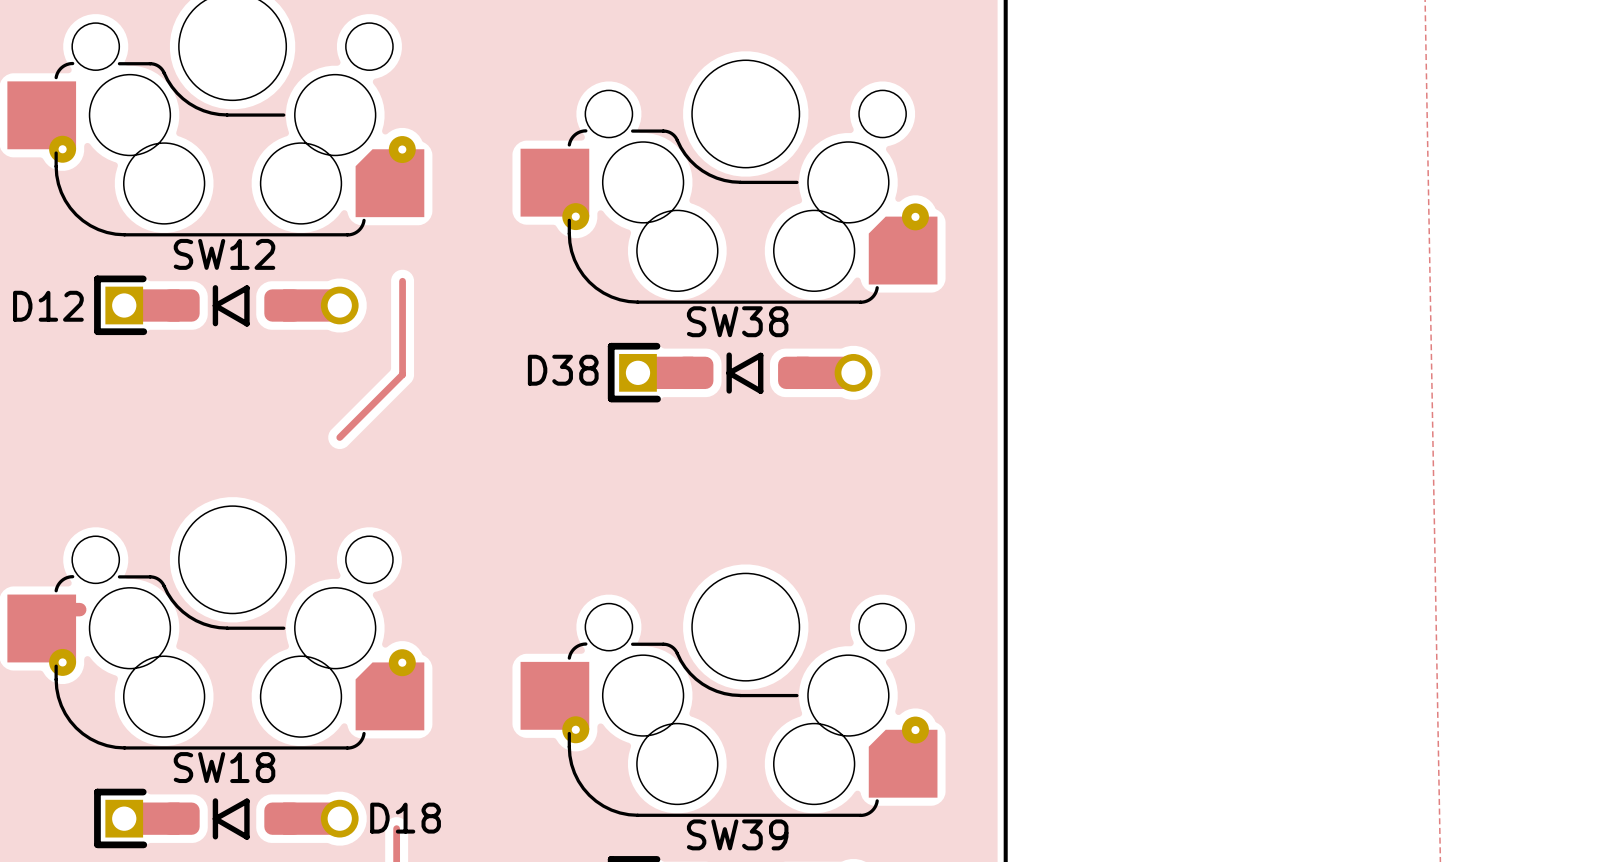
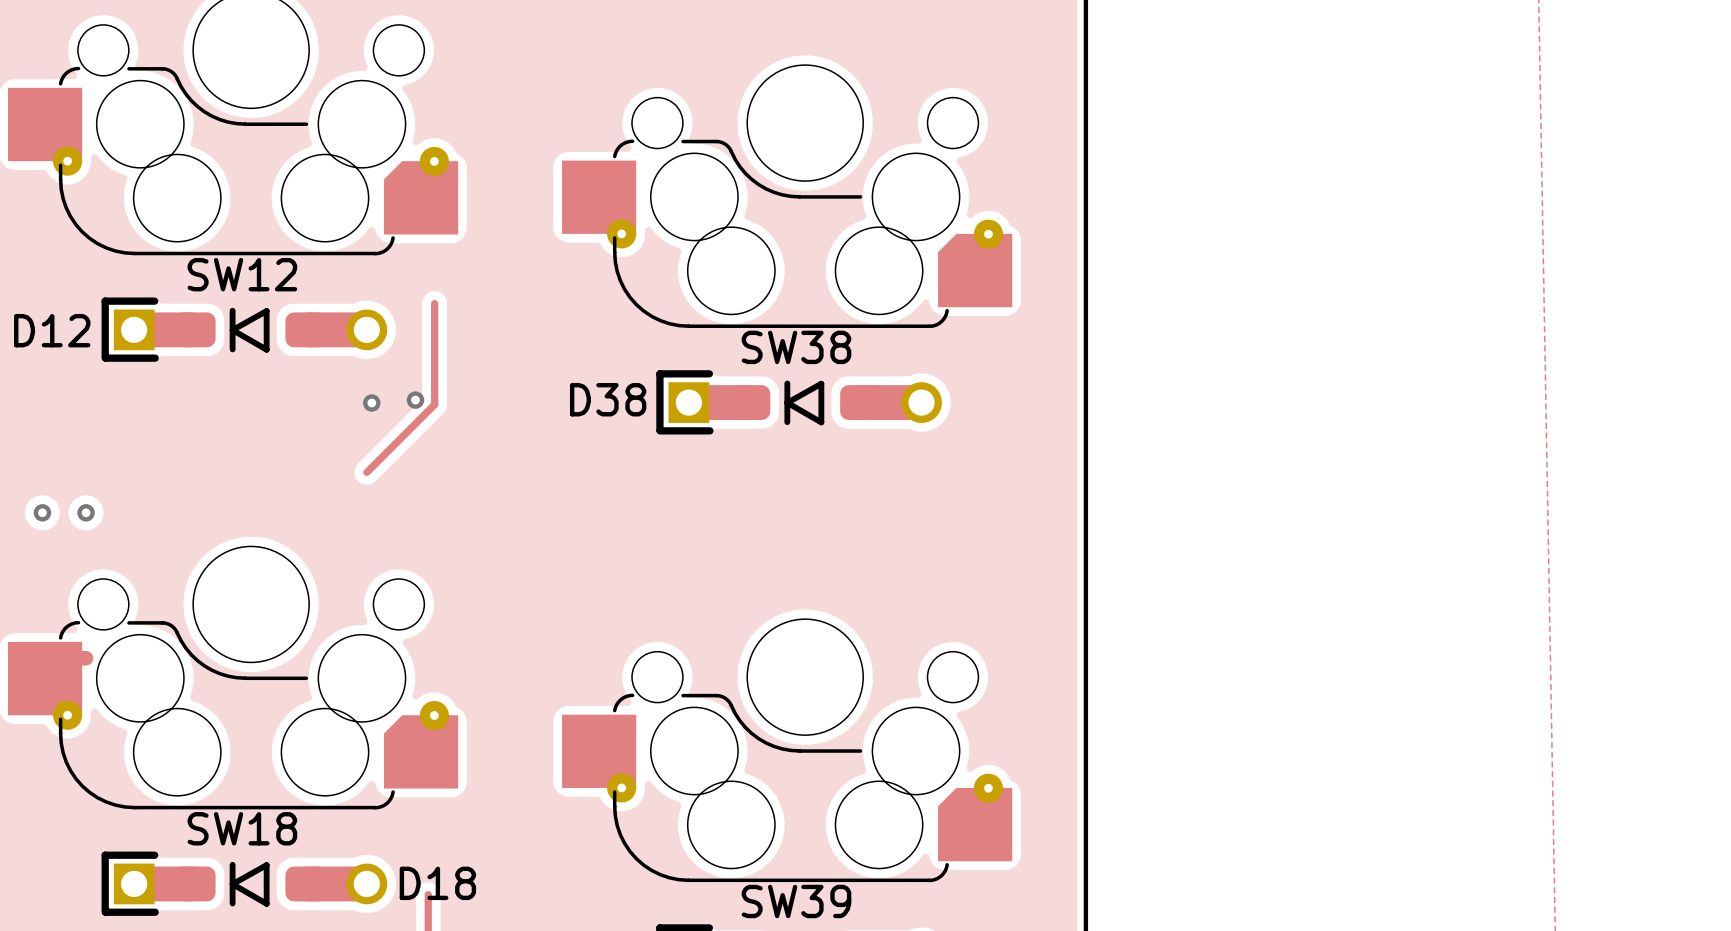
via: none -> (415, 400)
via: none -> (371, 403)
via: none -> (42, 512)
via: none -> (86, 512)

